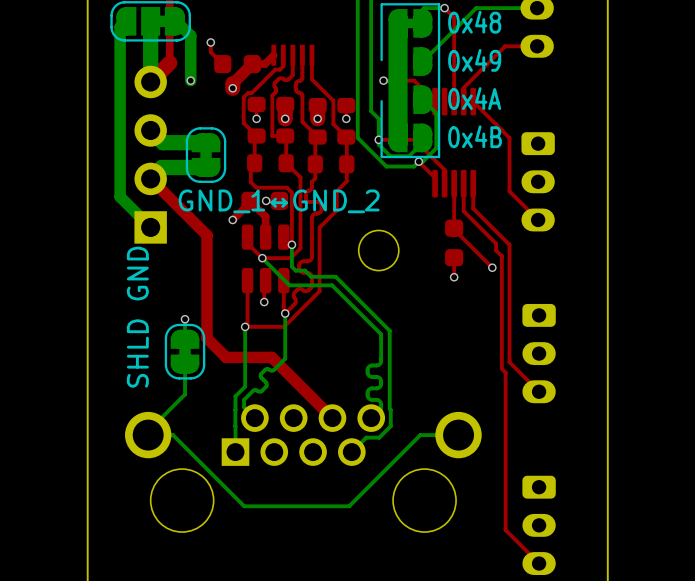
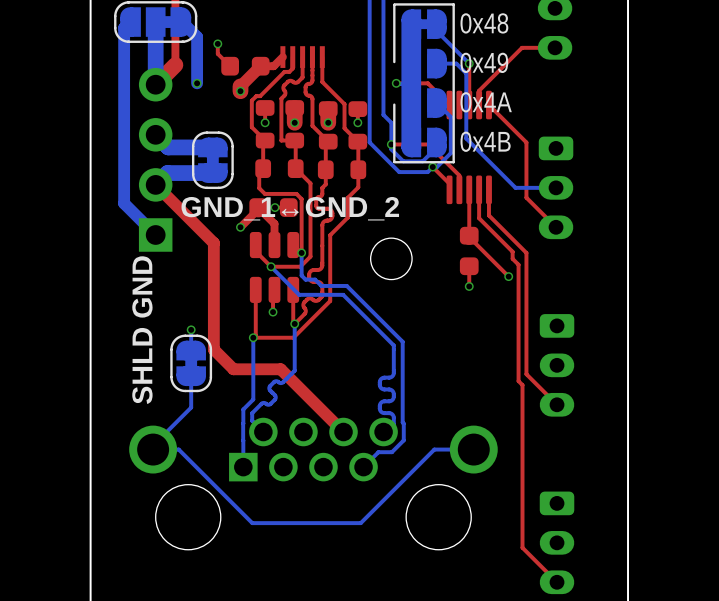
top track: (444, 8) (454, 17) (454, 61) -> none
bottom track: (444, 8) (423, 8) (422, 23) -> (469, 63) (436, 31) (436, 24)
via: (444, 8) -> none
bottom track: (537, 8) (476, 8) (422, 61) -> (556, 187) (515, 187) (466, 138) (466, 73) (456, 63) (436, 63)
via: none -> (469, 63)

